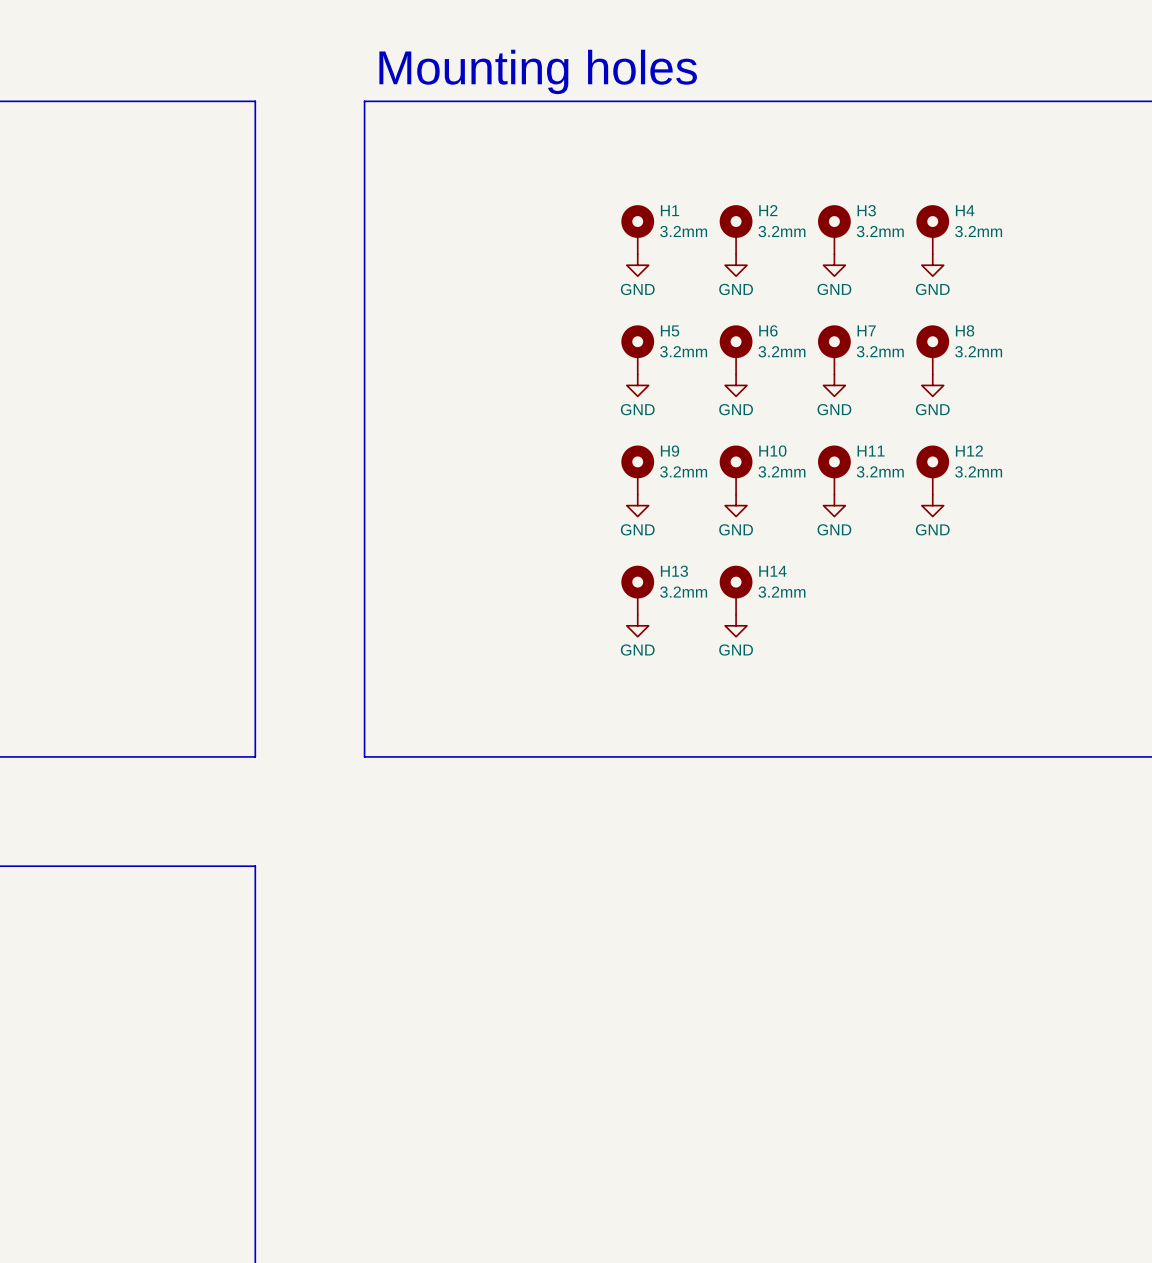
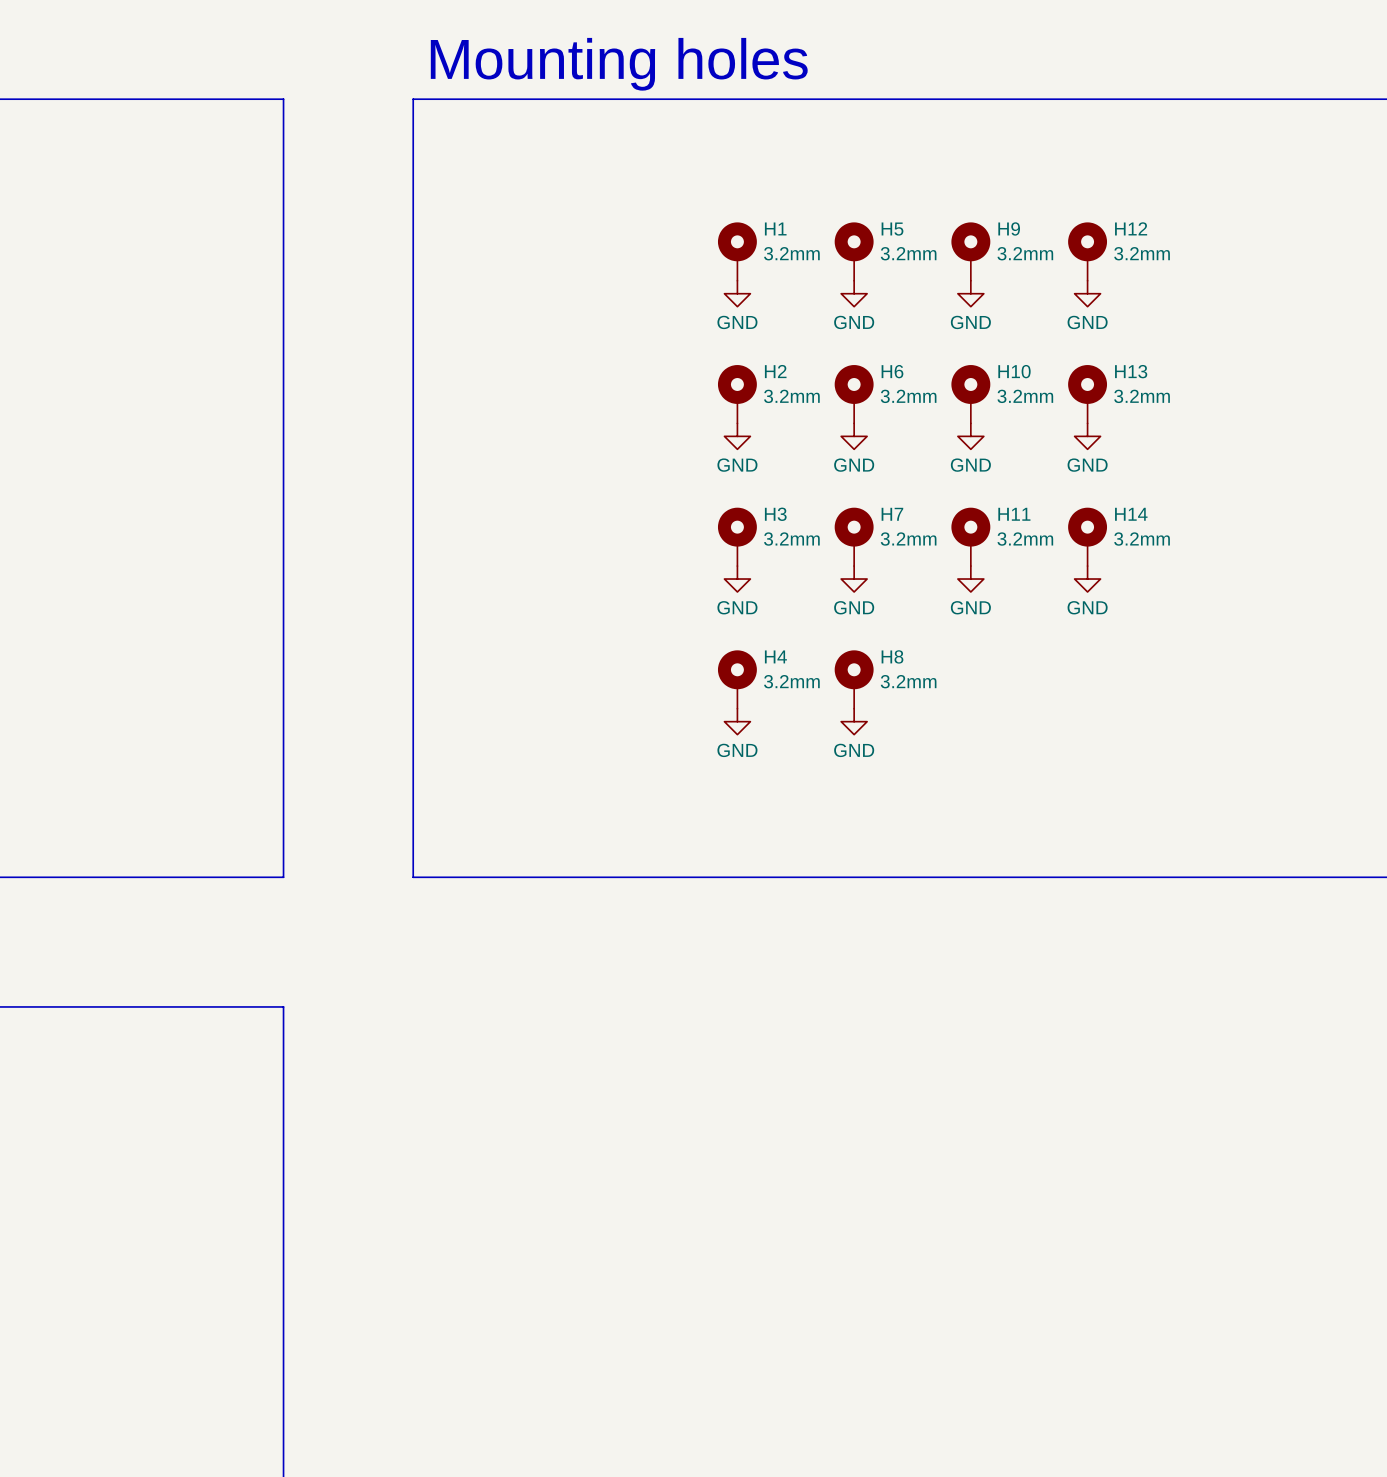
H2 name: H2 (768, 210) -> H5 (892, 229)
H3 name: H3 (866, 210) -> H9 (1009, 228)
H4 name: H4 (965, 210) -> H12 (1131, 228)
H5 name: H5 (670, 330) -> H2 (775, 371)
H7 name: H7 (866, 330) -> H10 (1014, 371)
H8 name: H8 (965, 330) -> H13 (1131, 371)
H9 name: H9 (670, 451) -> H3 (775, 514)
H10 name: H10 (772, 451) -> H7 (892, 514)
H12 name: H12 (969, 451) -> H14 (1131, 514)
H13 name: H13 (674, 571) -> H4 (775, 656)
H14 name: H14 (772, 571) -> H8 (892, 656)

